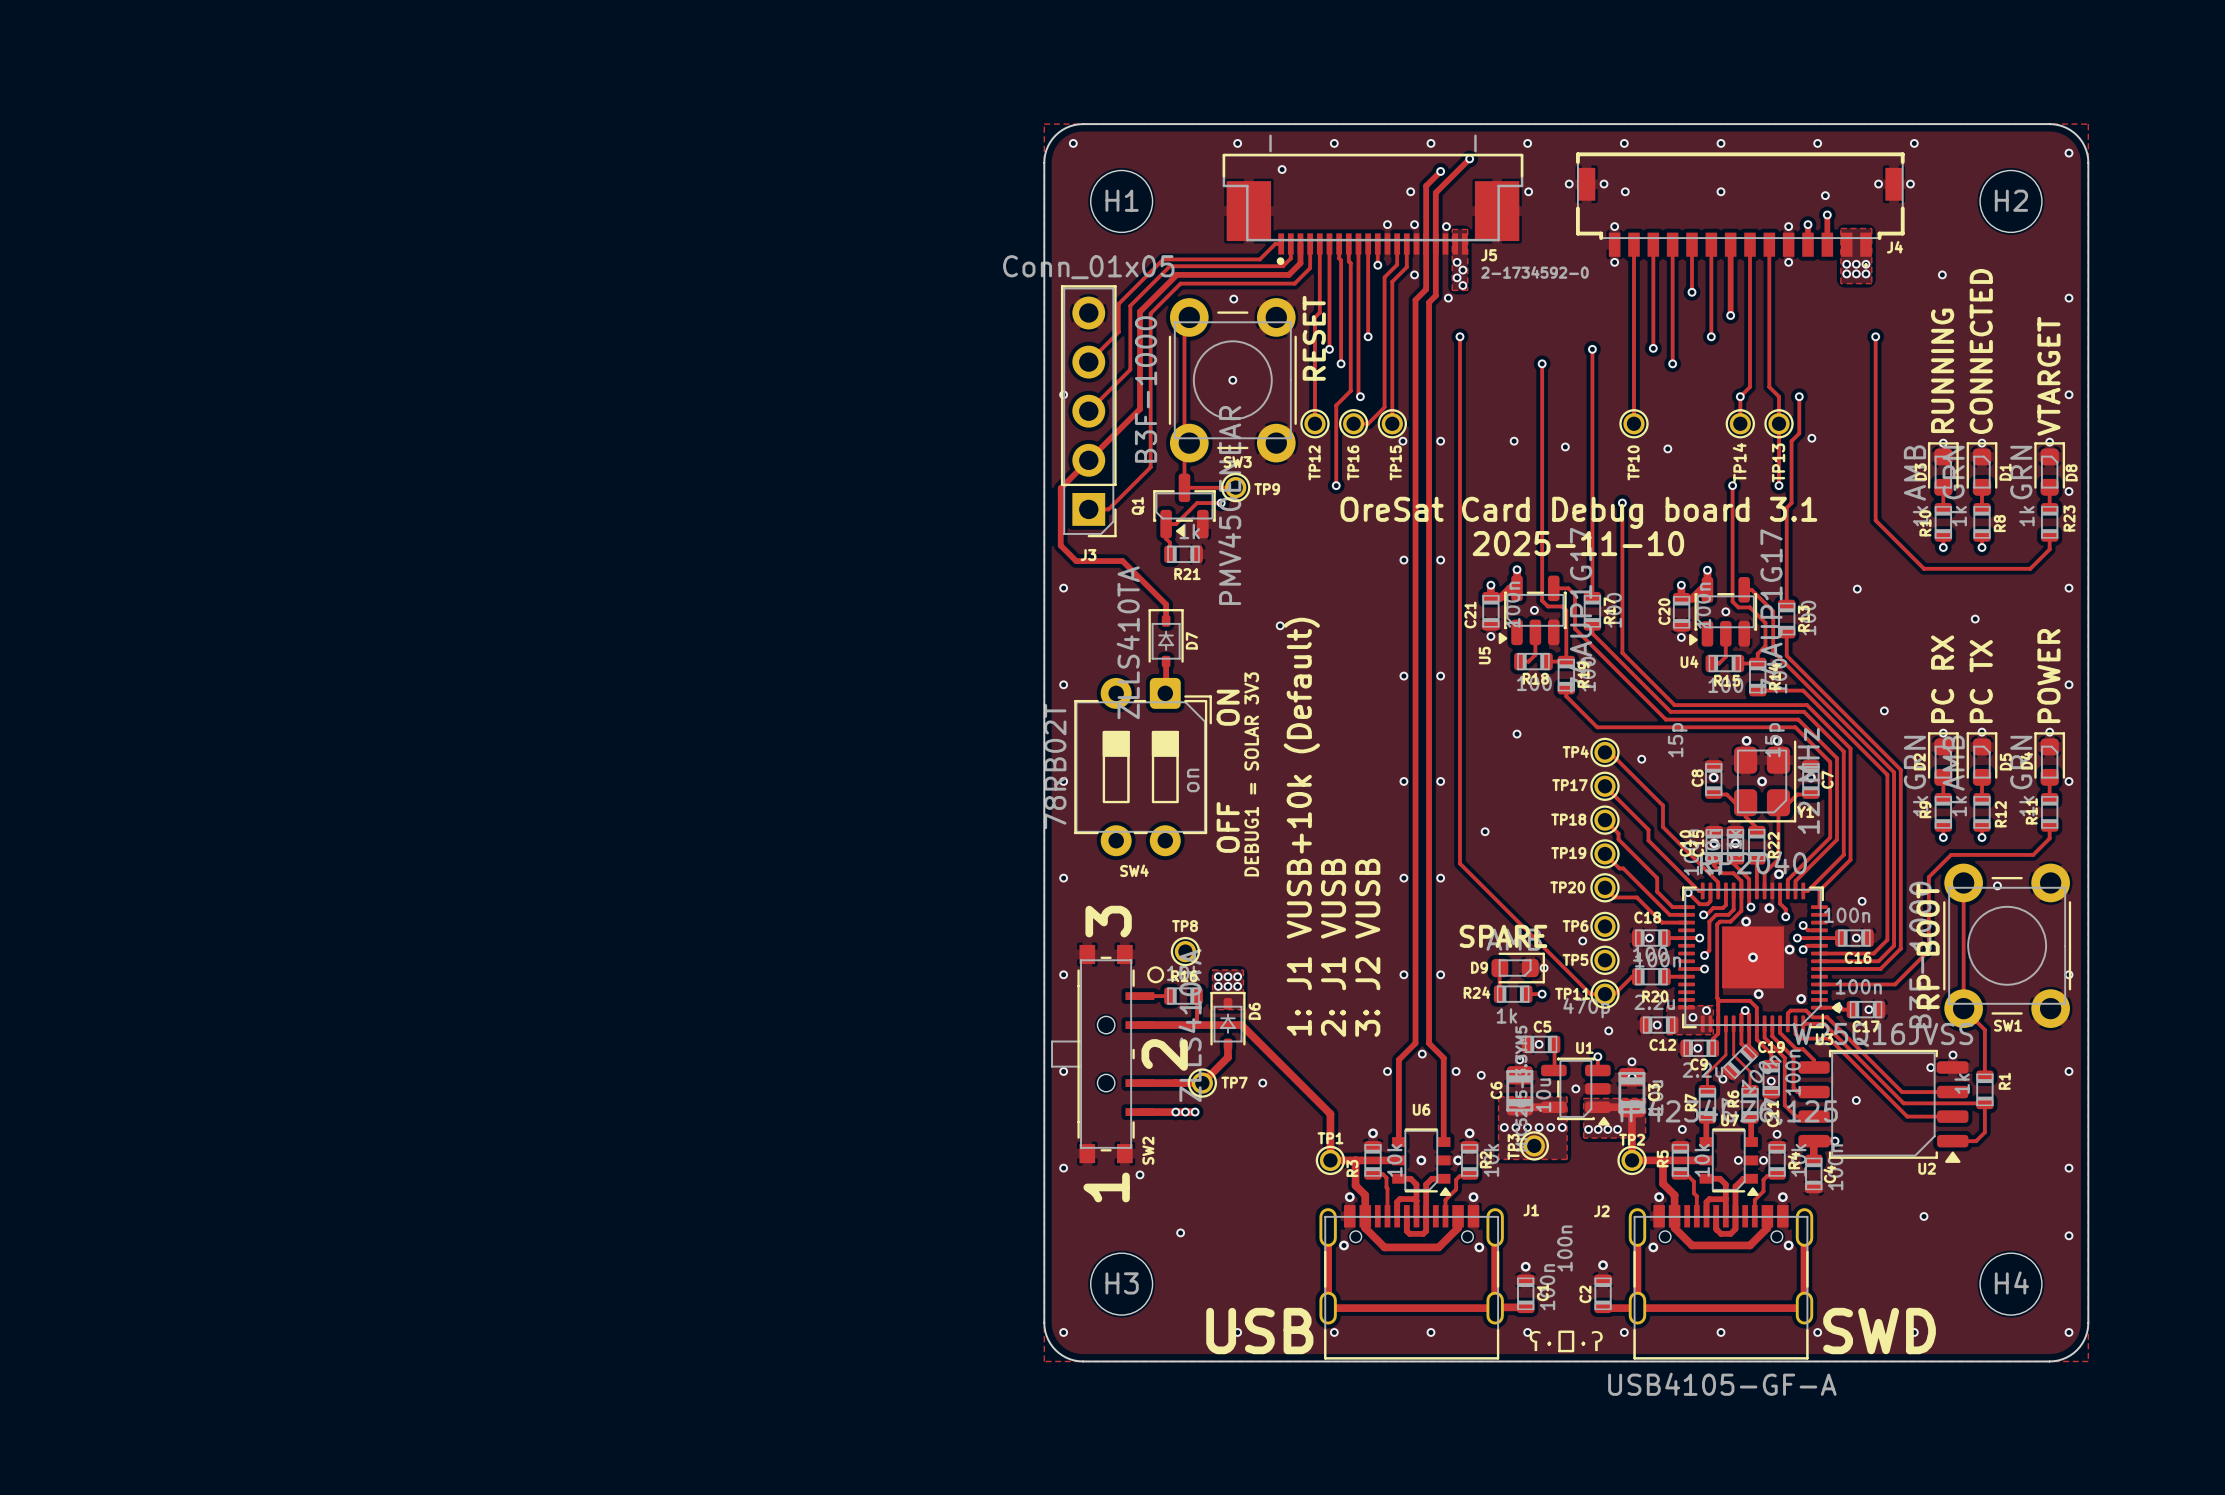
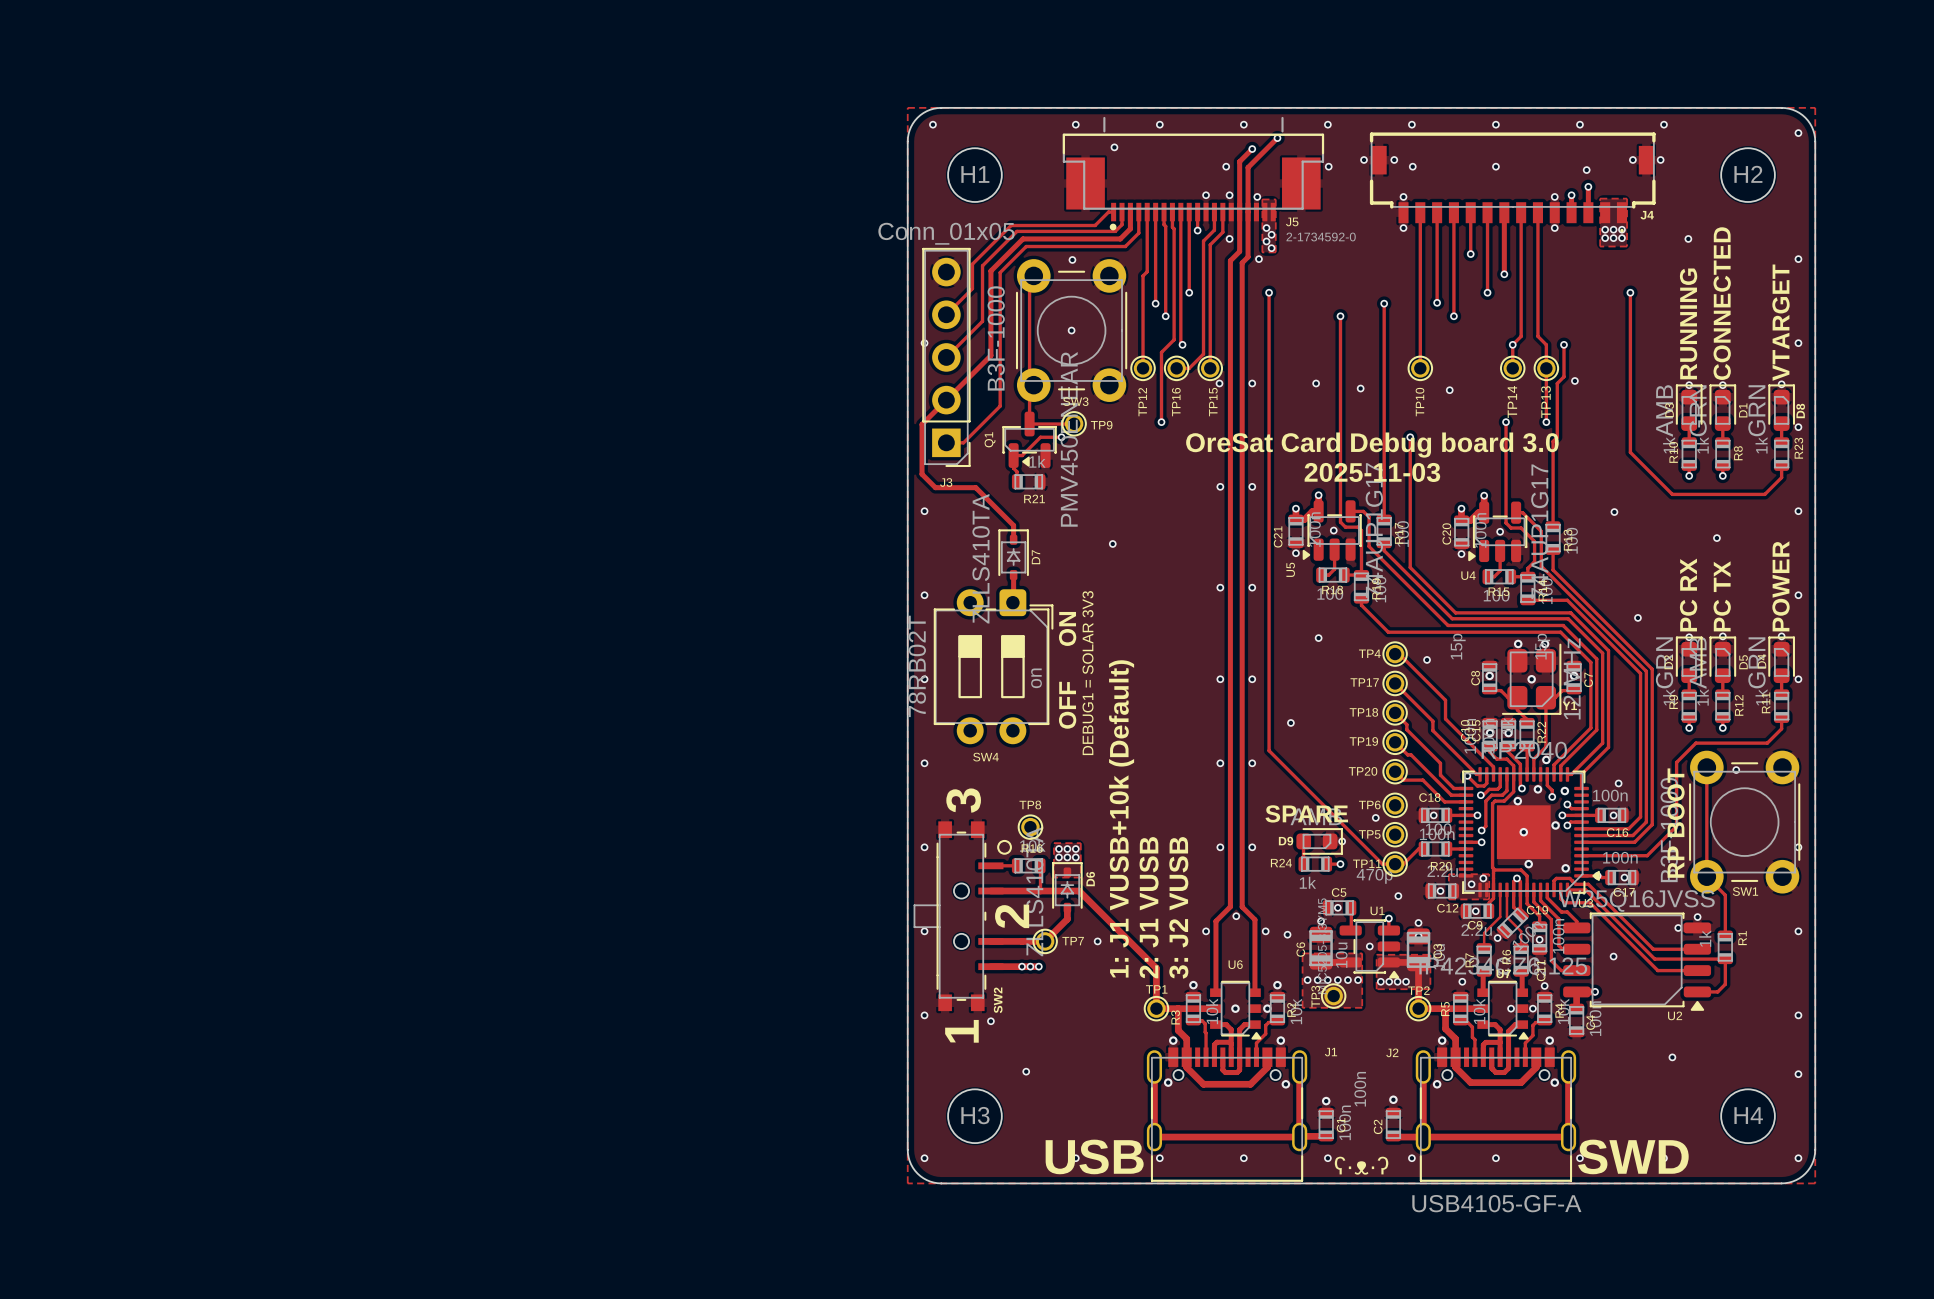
text: RESET (1314, 338) -> none
text: OreSat Card Debug board 3.1 (1578, 512) -> OreSat Card Debug board 3.0 (1372, 445)
text: 2025-11-10 (1578, 543) -> 2025-11-03 (1372, 472)
text position: 1: J1 VUSB+10k (Default) (1301, 826) -> 1: J1 VUSB+10k (Default) (1121, 818)
via: none -> (1564, 791)
text position: 2: J1 VUSB (1333, 947) -> 2: J1 VUSB (1149, 907)
text position: 3: J2 VUSB (1367, 947) -> 3: J2 VUSB (1178, 907)

